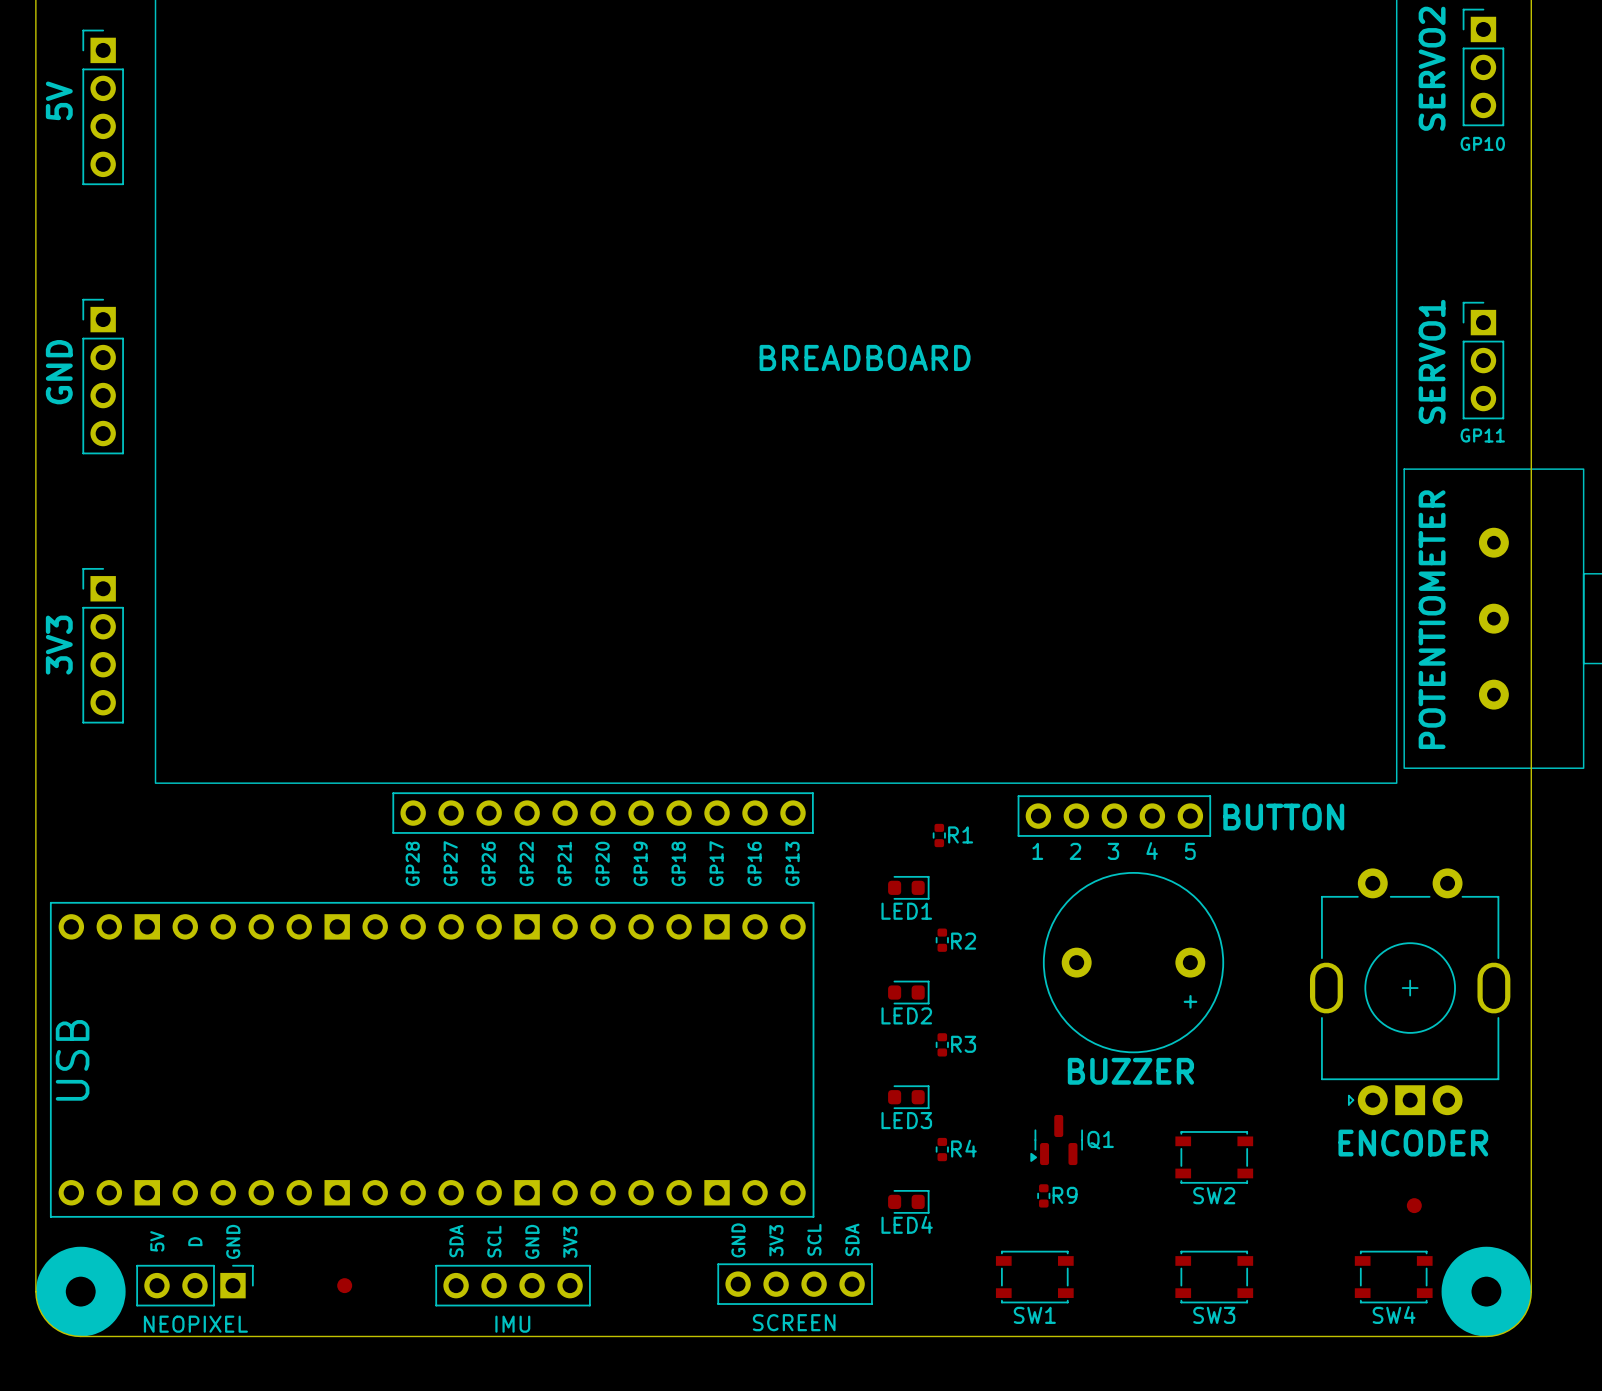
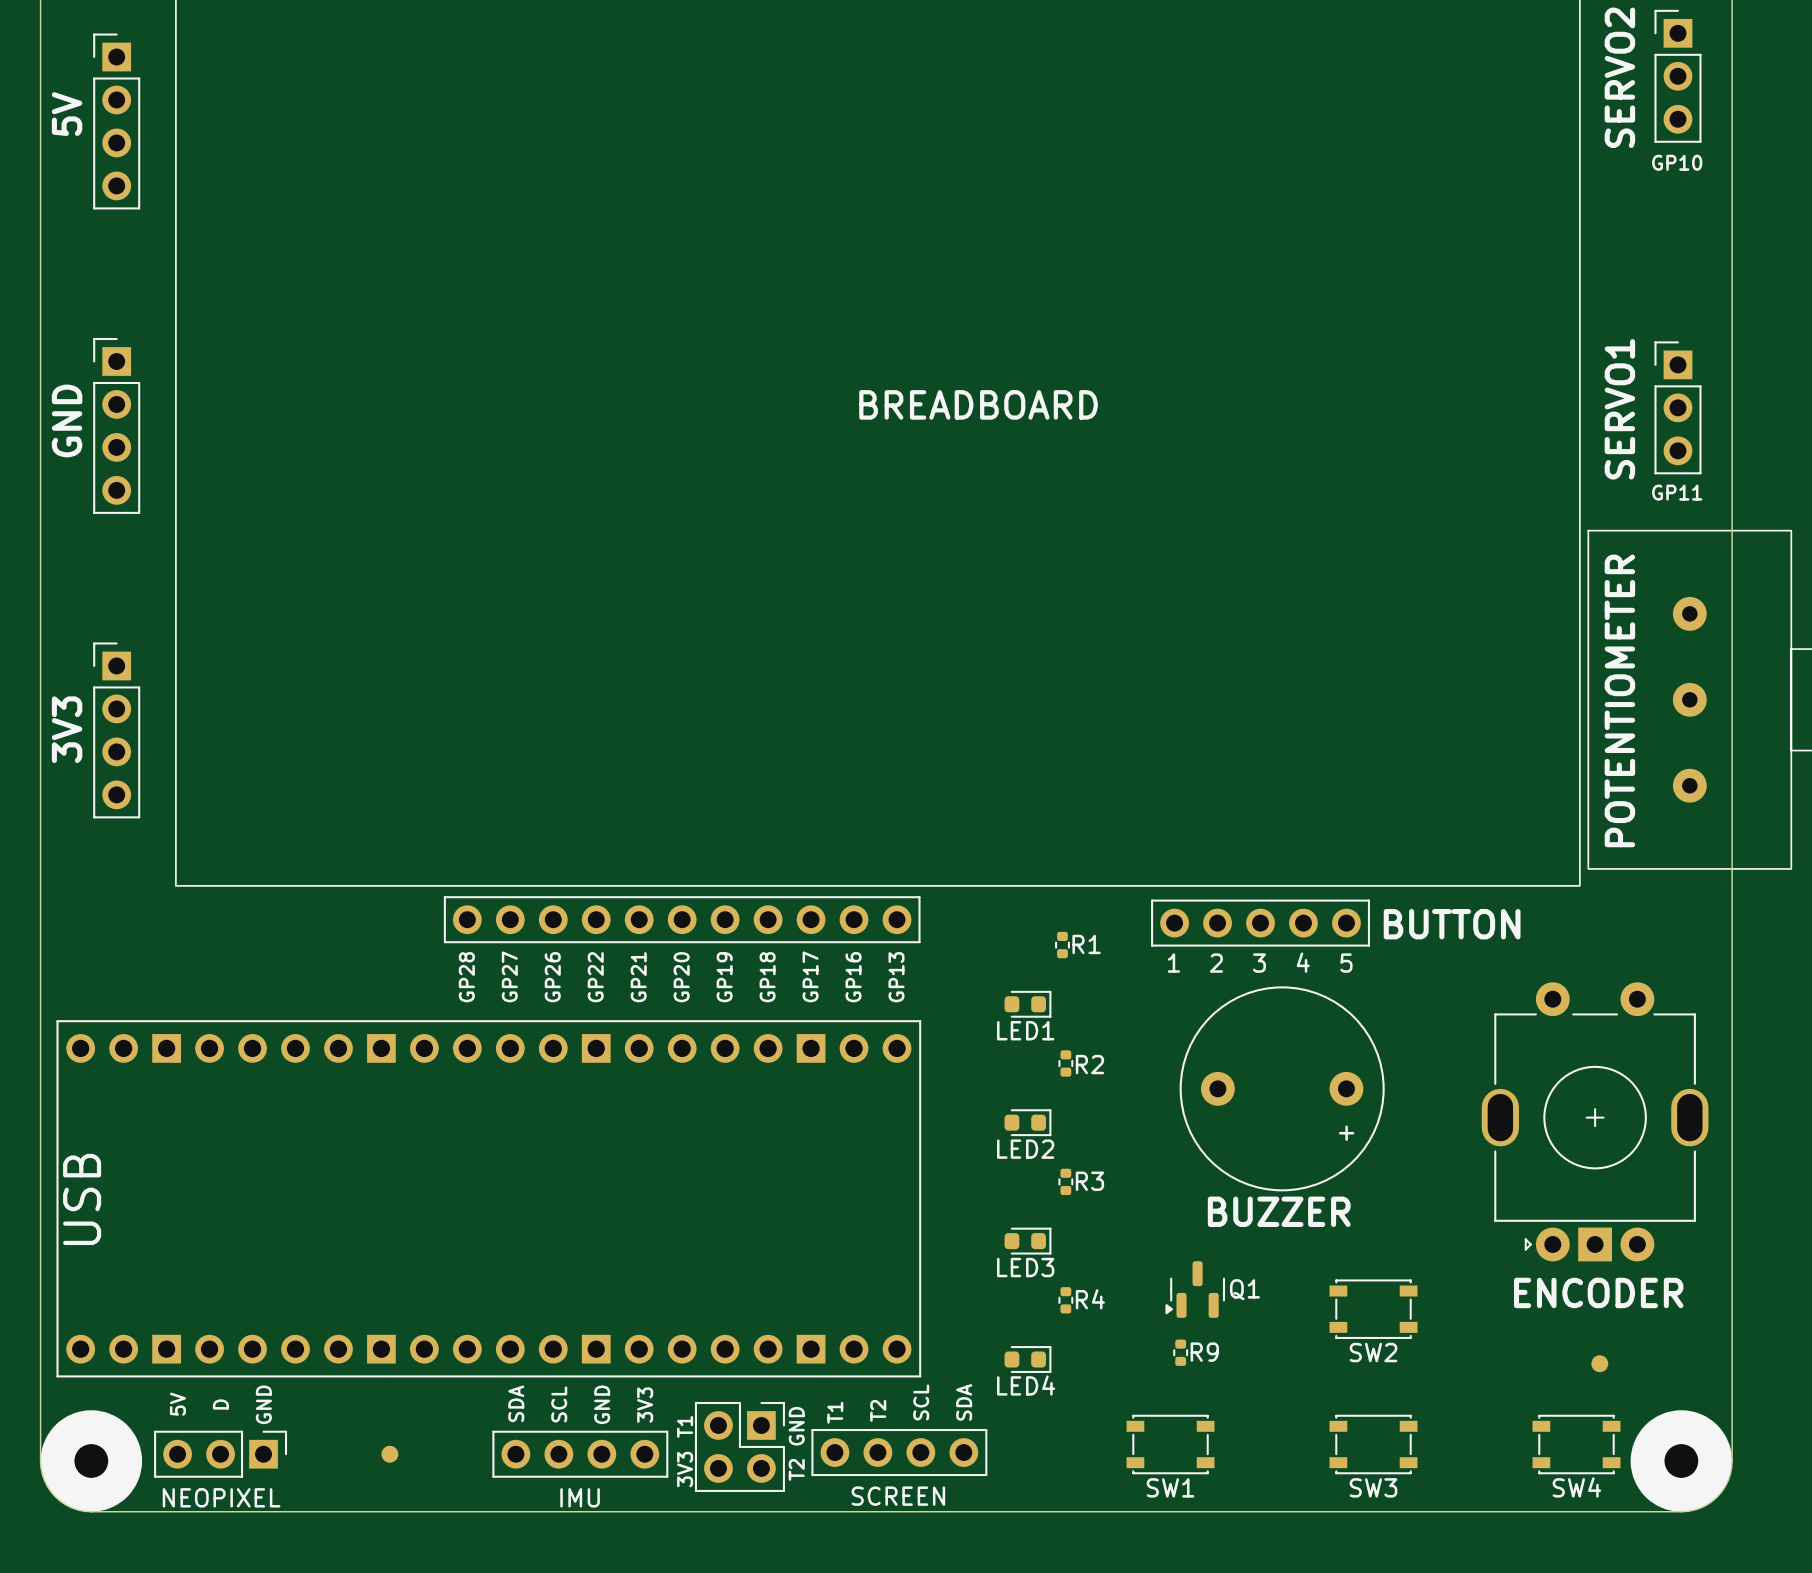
text: GND (738, 1240) -> T1 (835, 1412)
text: 3V3 (776, 1240) -> T2 (878, 1410)
text: none -> GND (796, 1426)
text: none -> T1 (685, 1426)
part: none -> (739, 1446)
text: none -> 3V3 (685, 1469)
text: none -> T2 (796, 1469)

